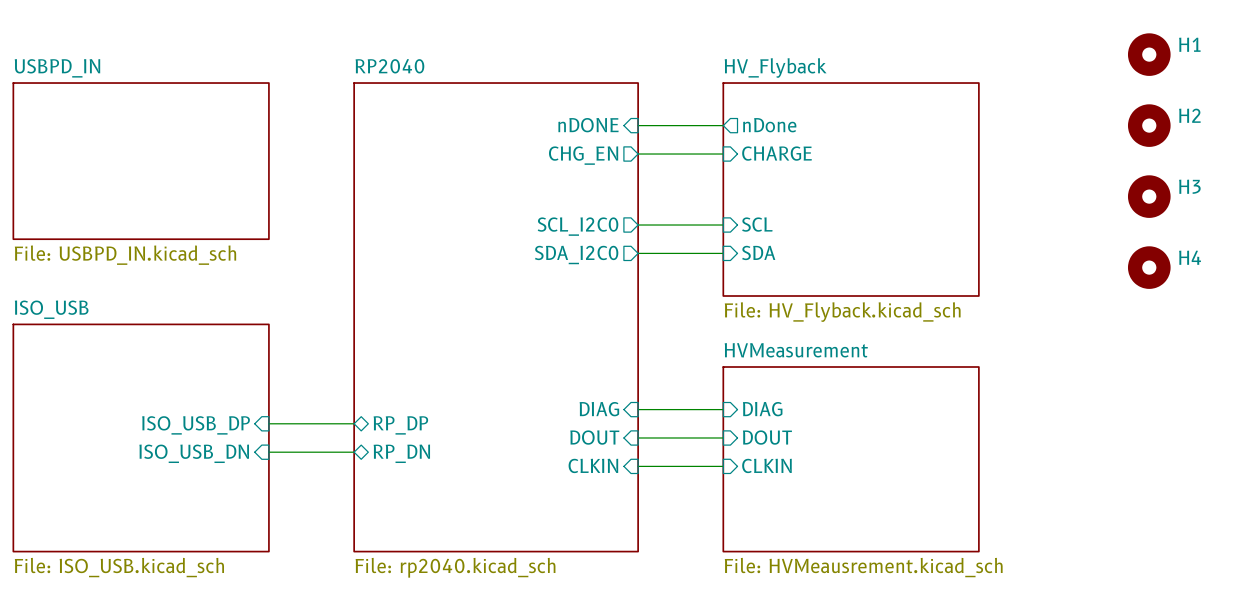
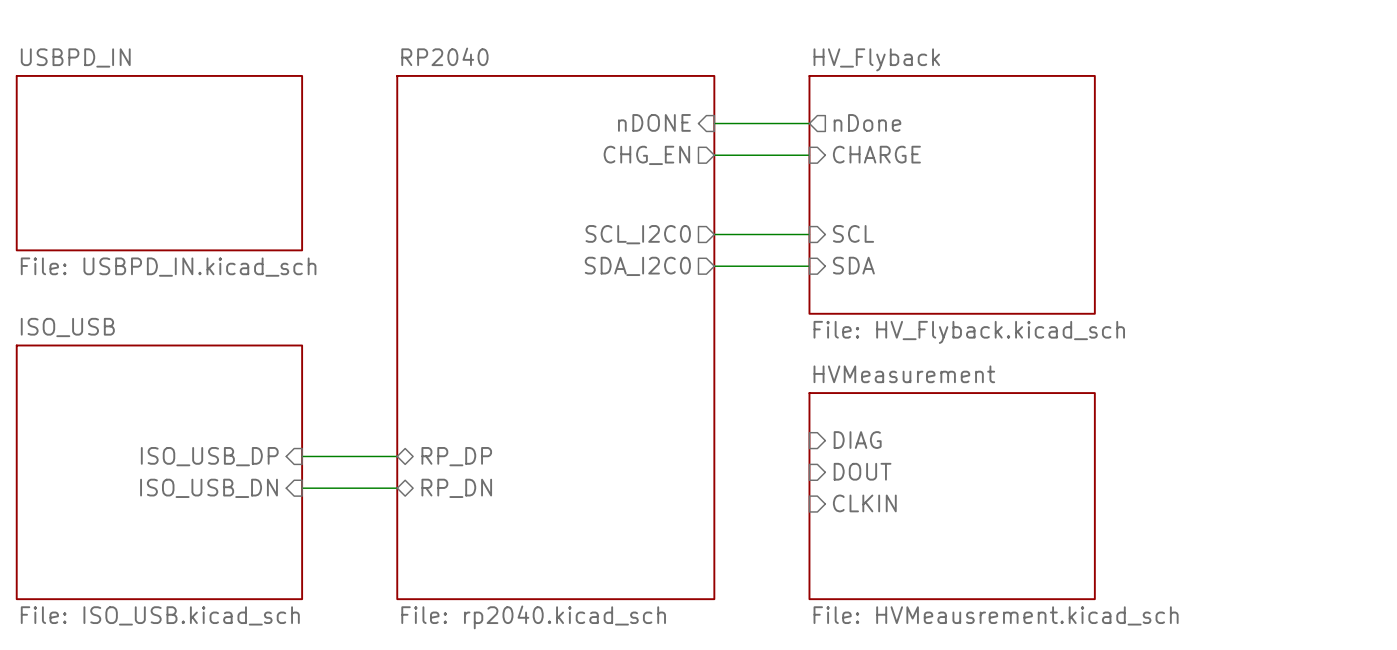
H1: (1149, 54) -> none
H2: (1149, 125) -> none
H3: (1149, 196) -> none
H4: (1149, 267) -> none
sheet pin: DIAG (599, 409) -> none
wire: (638, 409) (723, 409) -> none
sheet pin: DOUT (594, 437) -> none
wire: (638, 437) (723, 437) -> none
sheet pin: CLKIN (593, 465) -> none
wire: (638, 466) (723, 466) -> none

